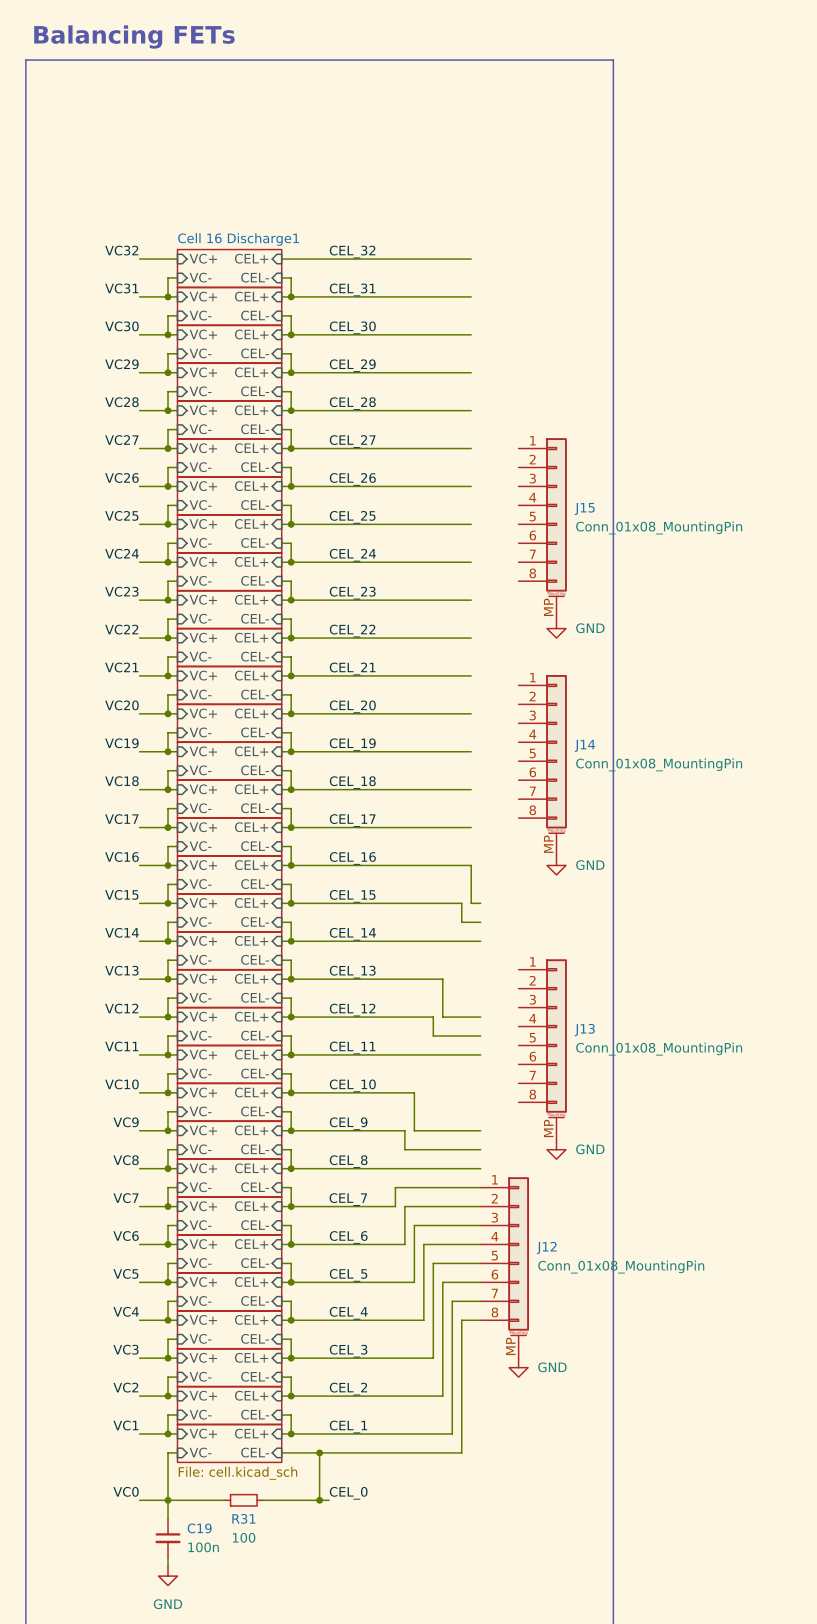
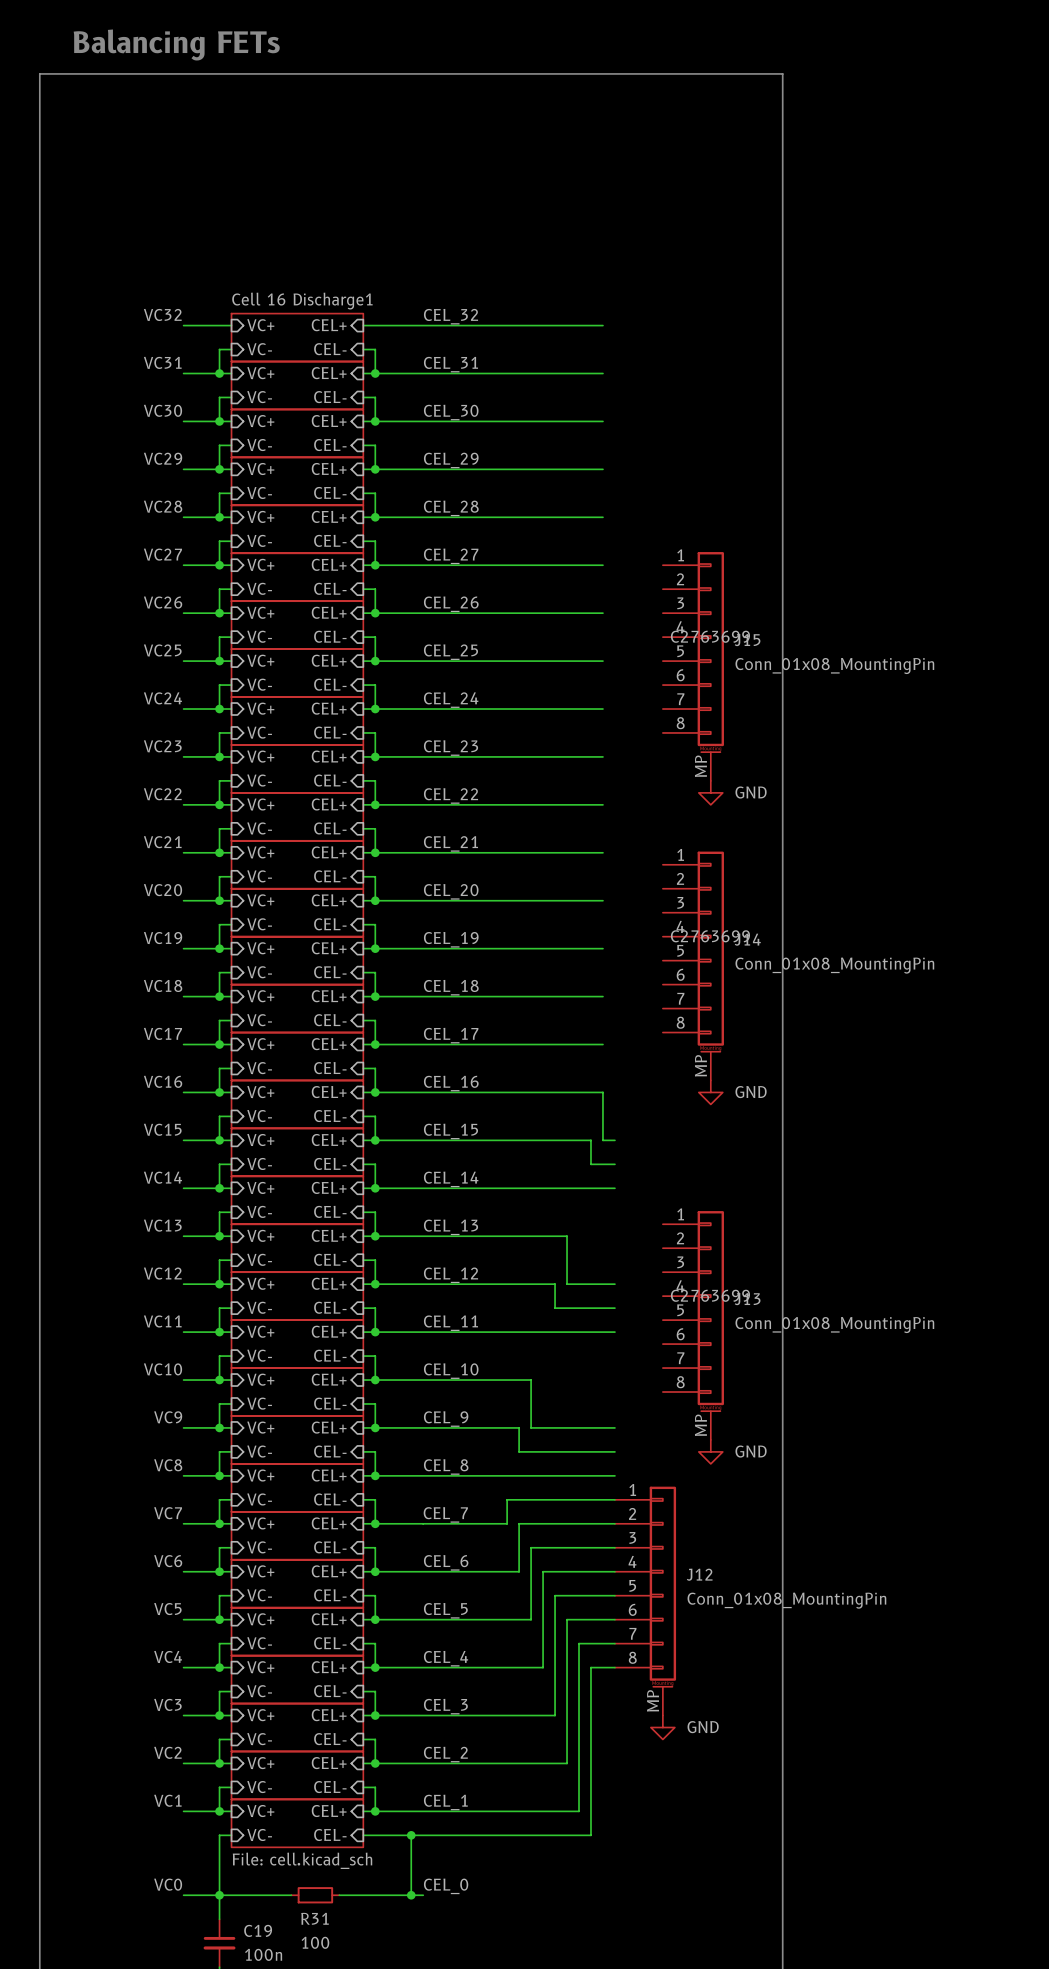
J15 text: none -> C2763699 (710, 636)
J14 text: none -> C2763699 (710, 936)
J13 text: none -> C2763699 (710, 1295)

